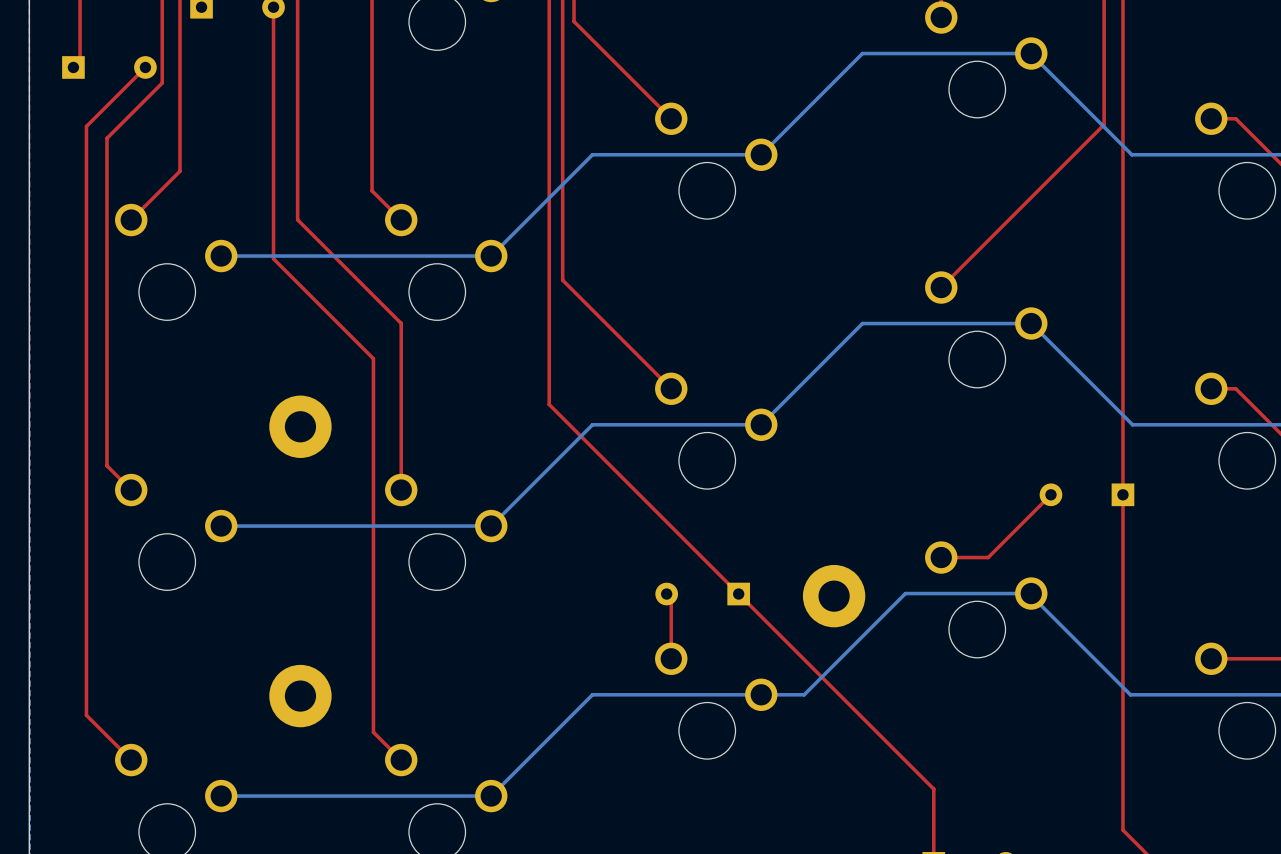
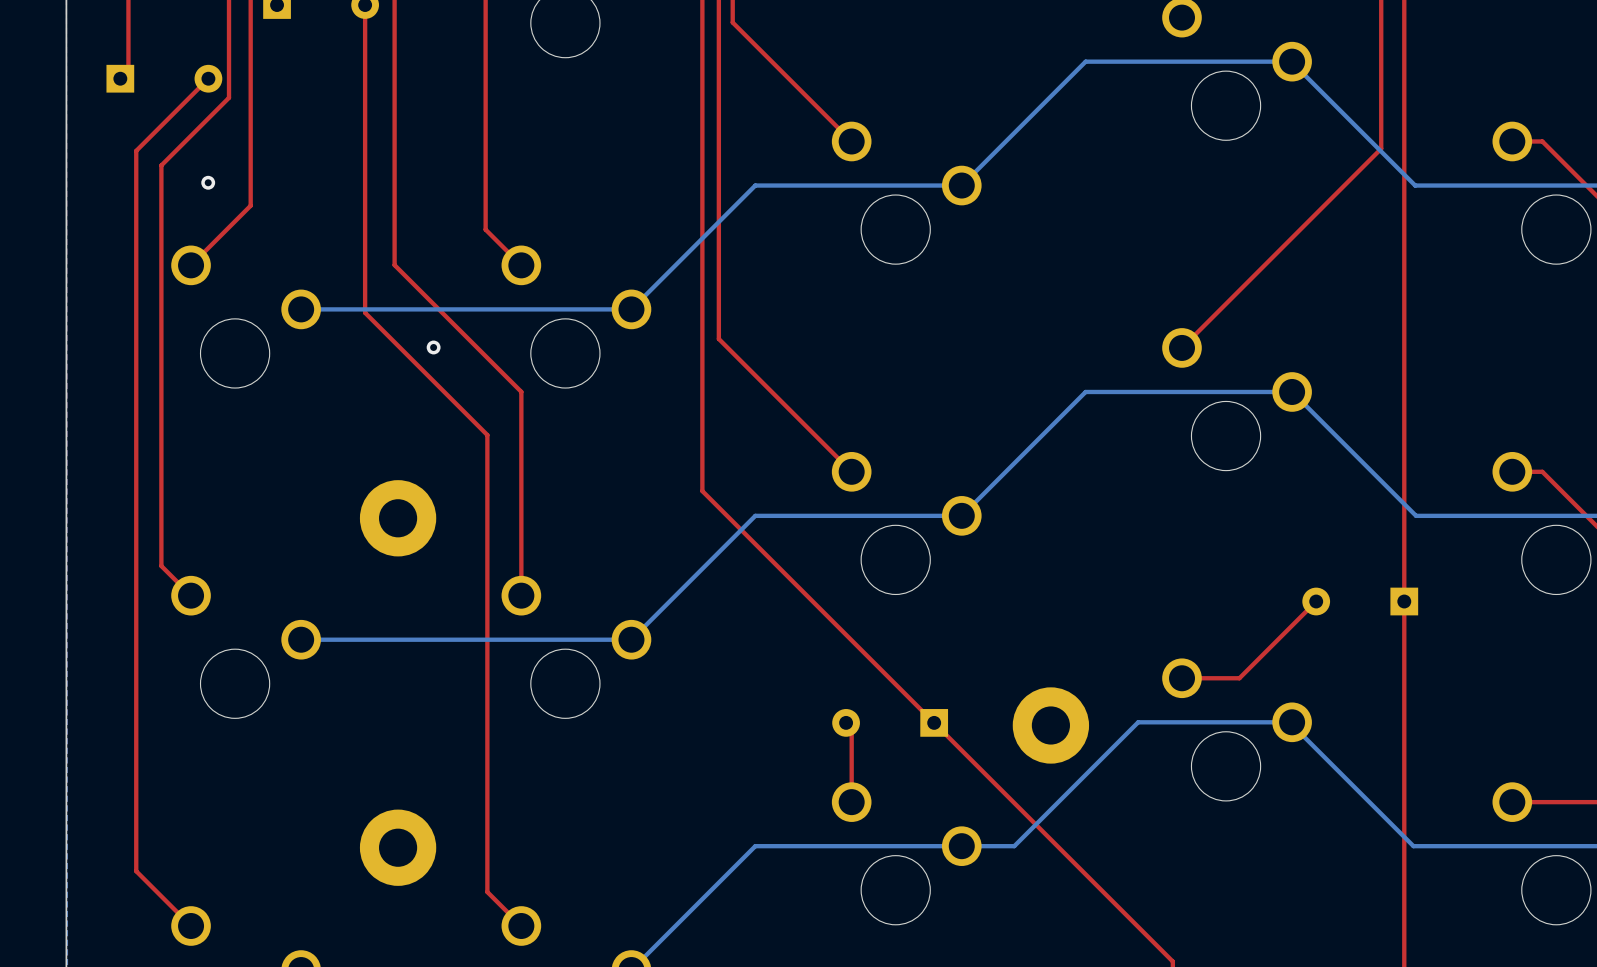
via: none -> (208, 182)
via: none -> (433, 347)

